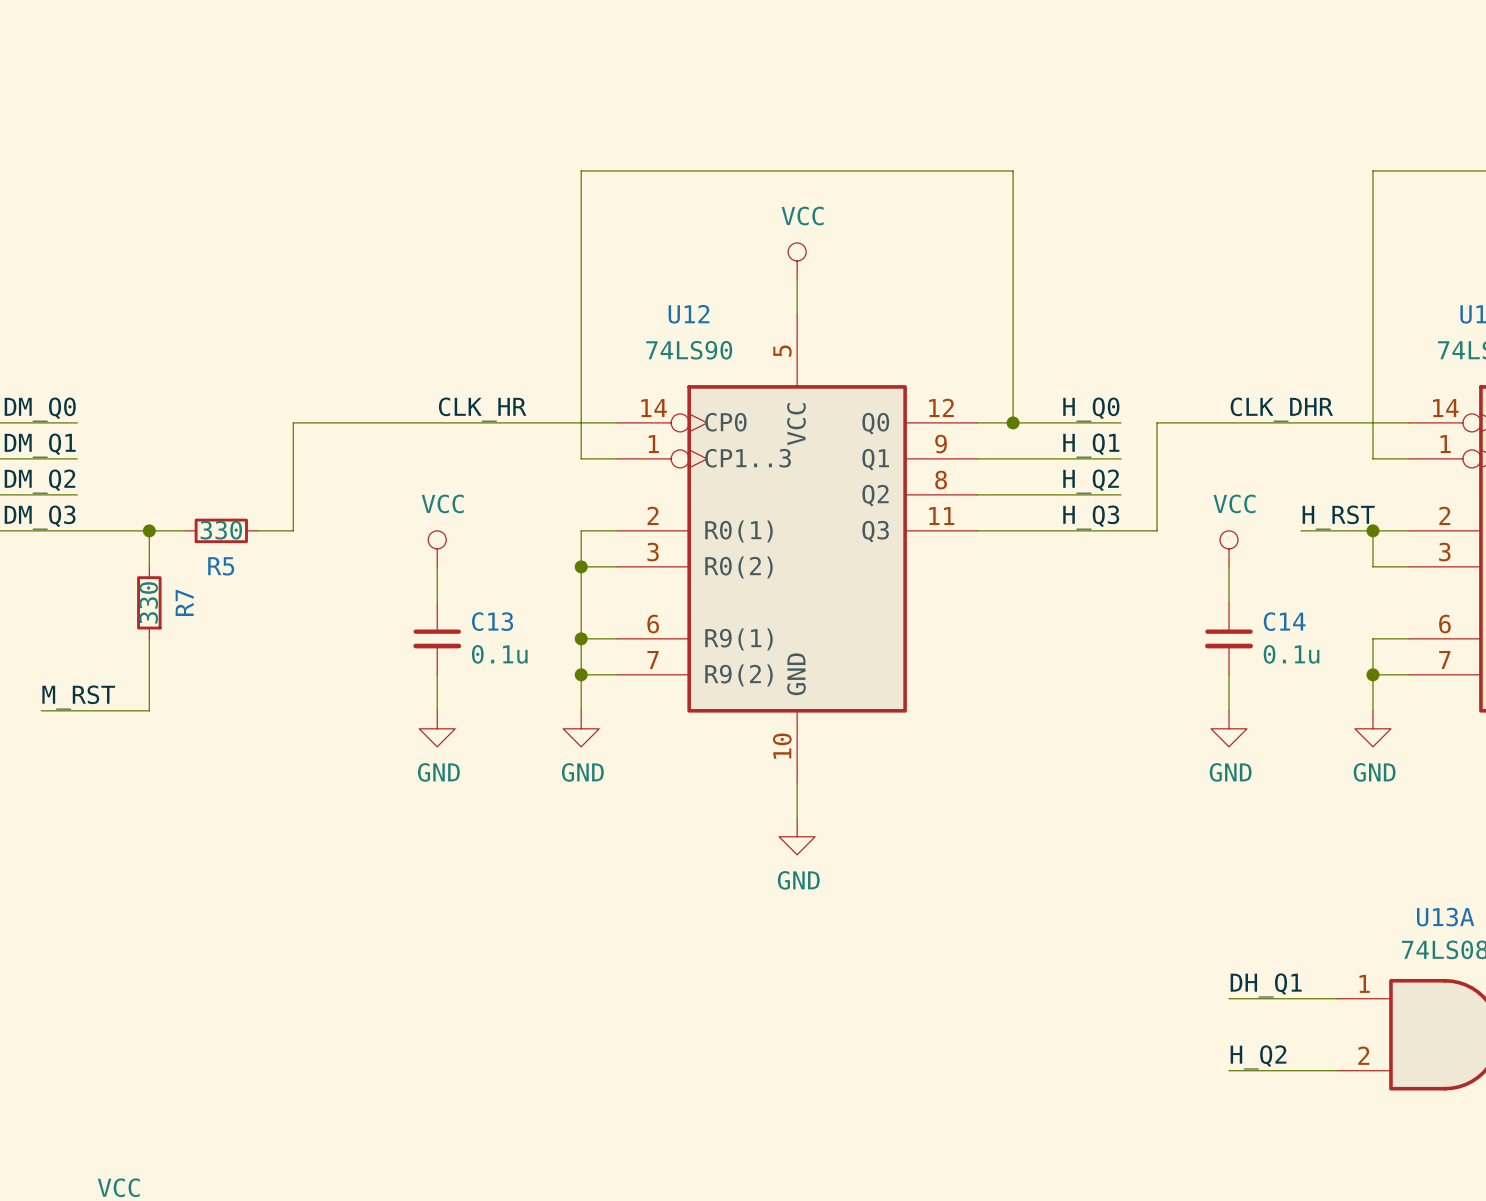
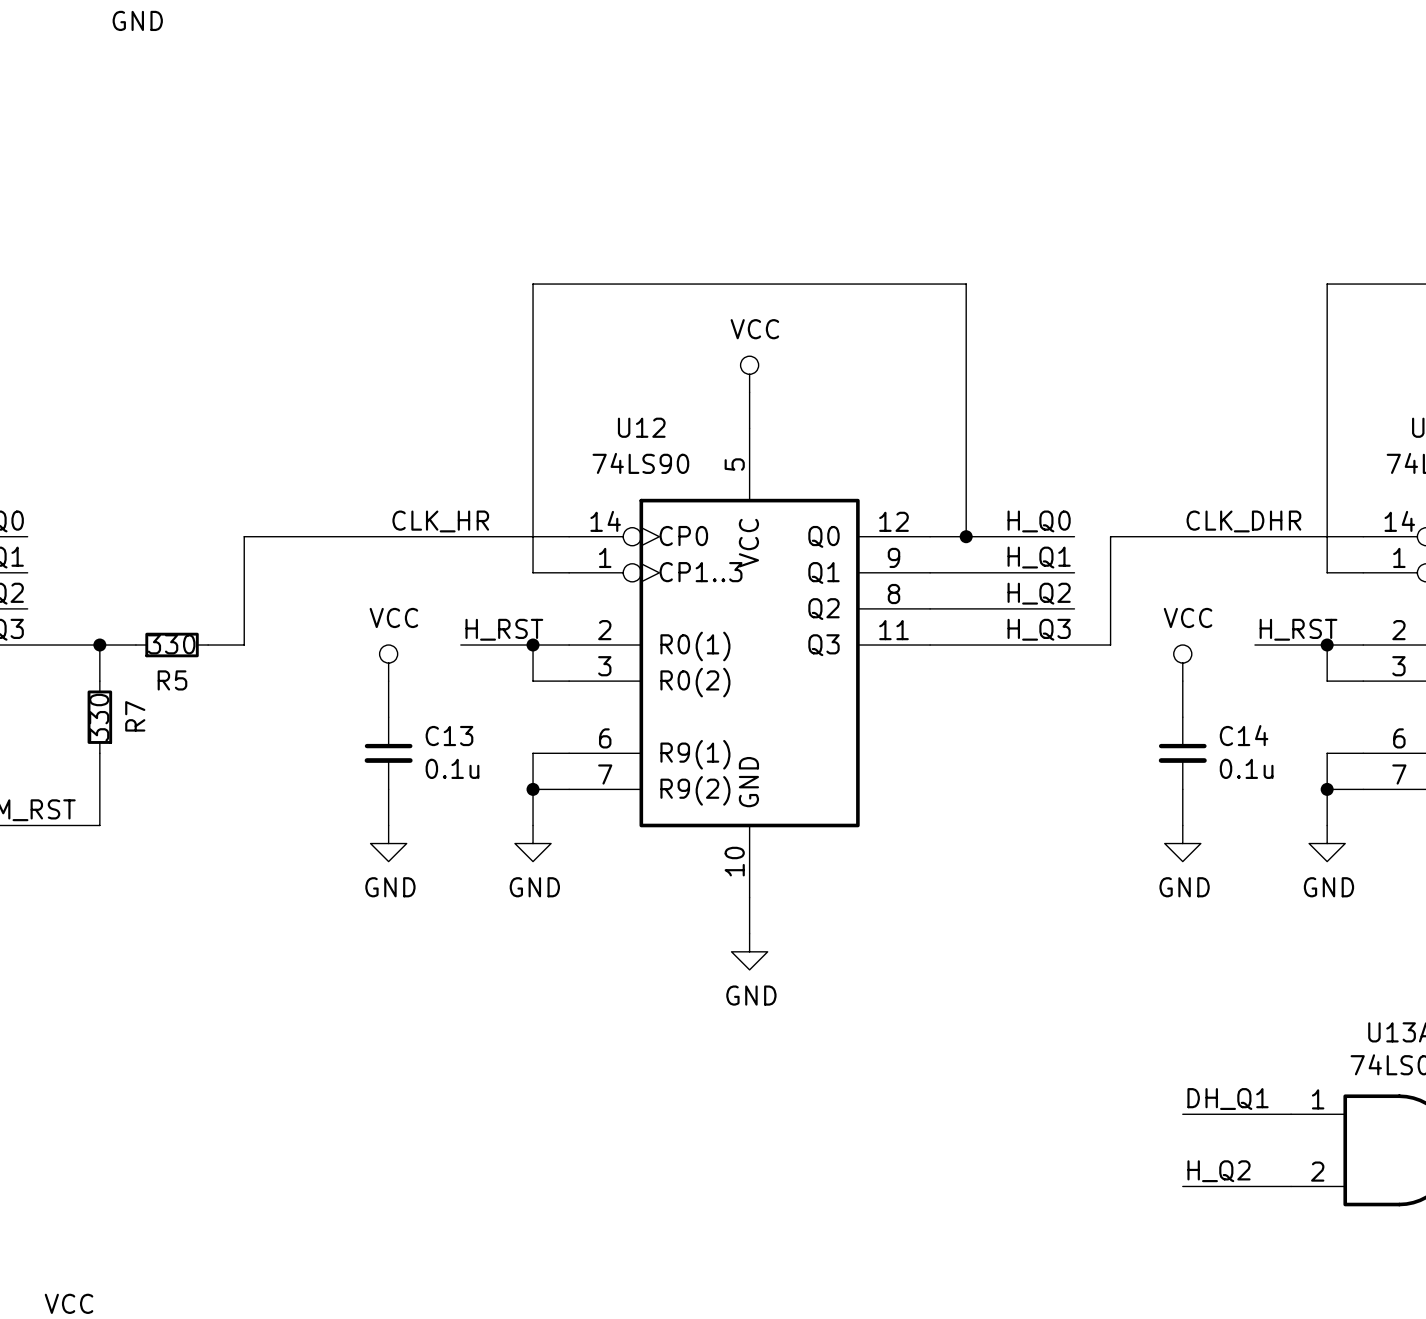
label: none -> H_RST (504, 629)
wire: none -> (460, 645) (533, 645)
wire: (581, 566) (581, 638) -> none
junction position: (581, 566) -> (533, 645)
junction: (581, 638) -> none

